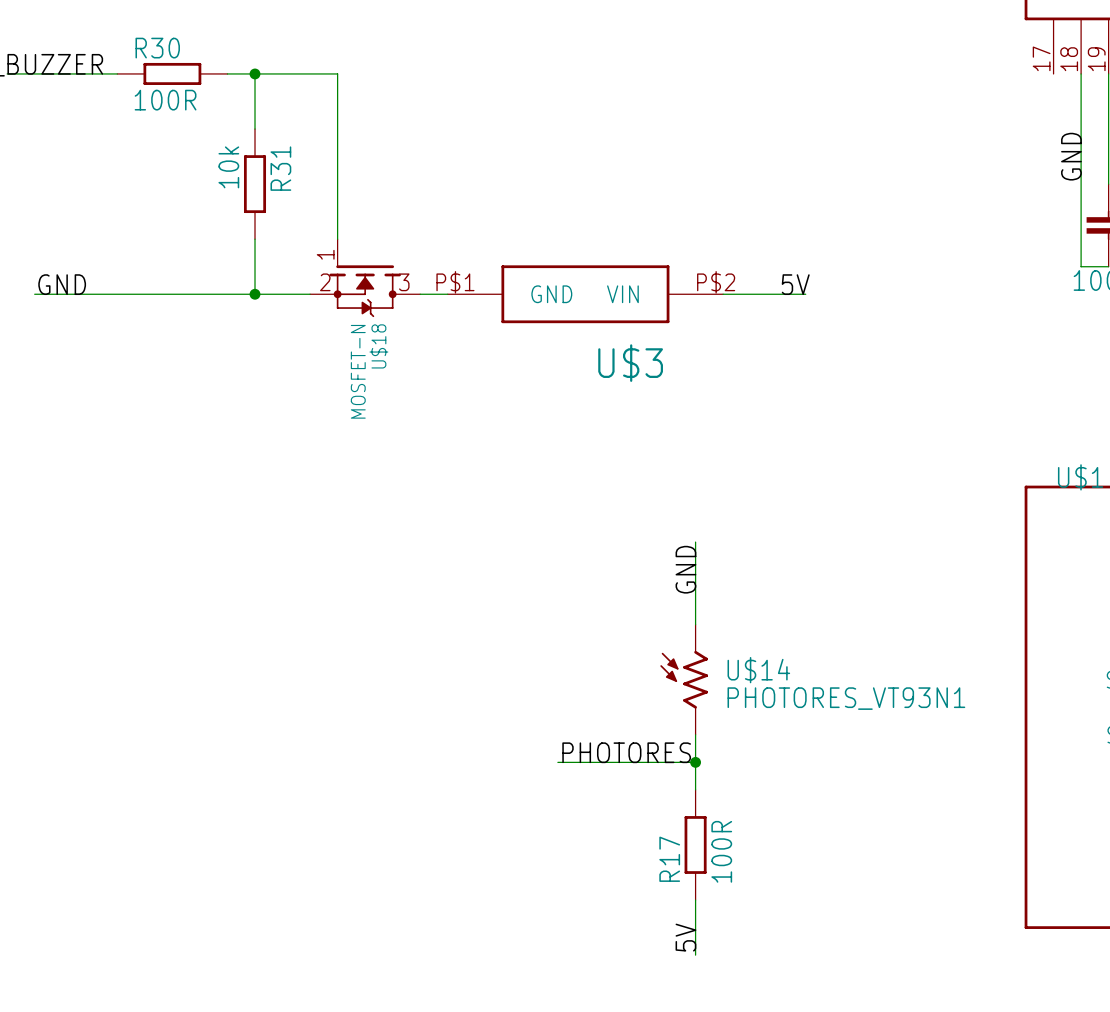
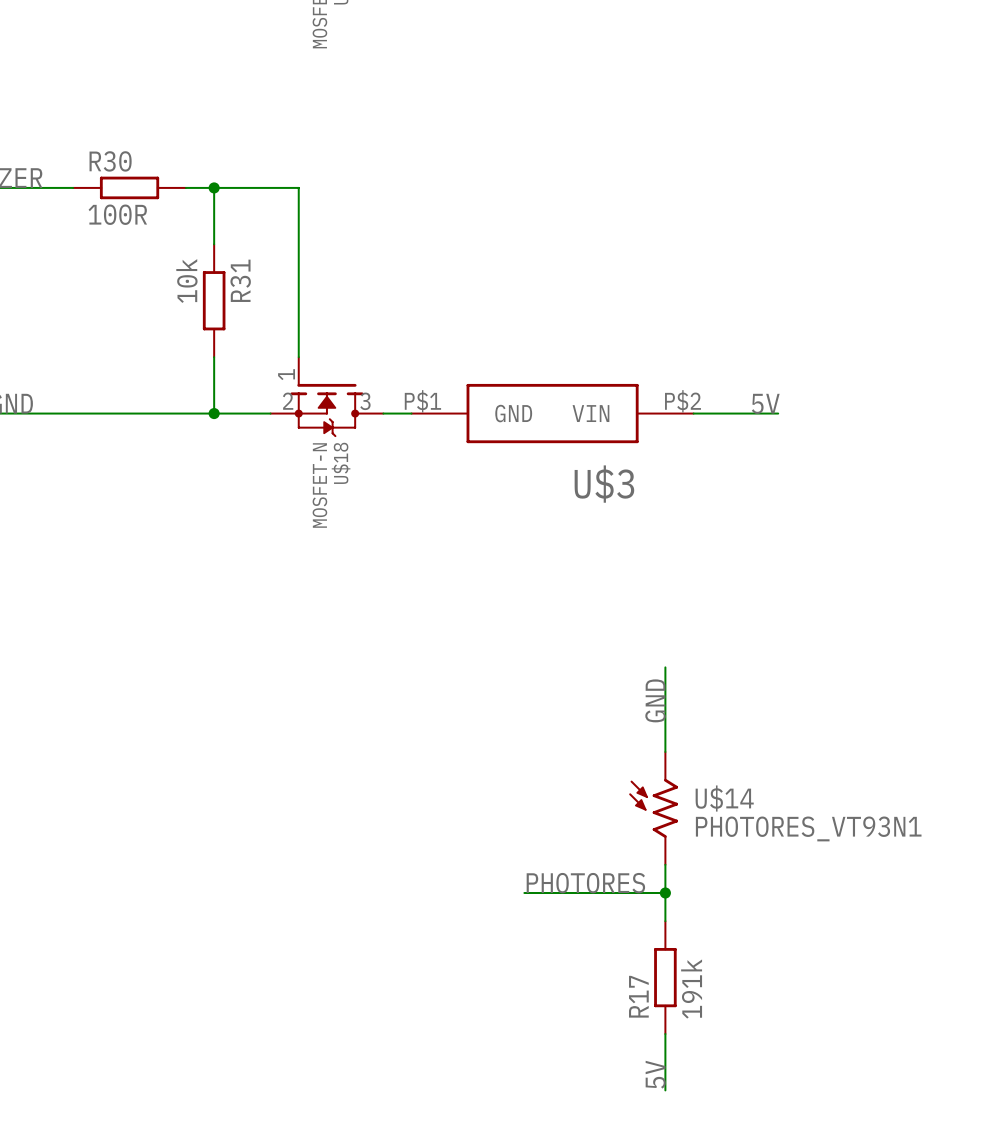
R17 value: 100R (721, 851) -> 191k (691, 989)

